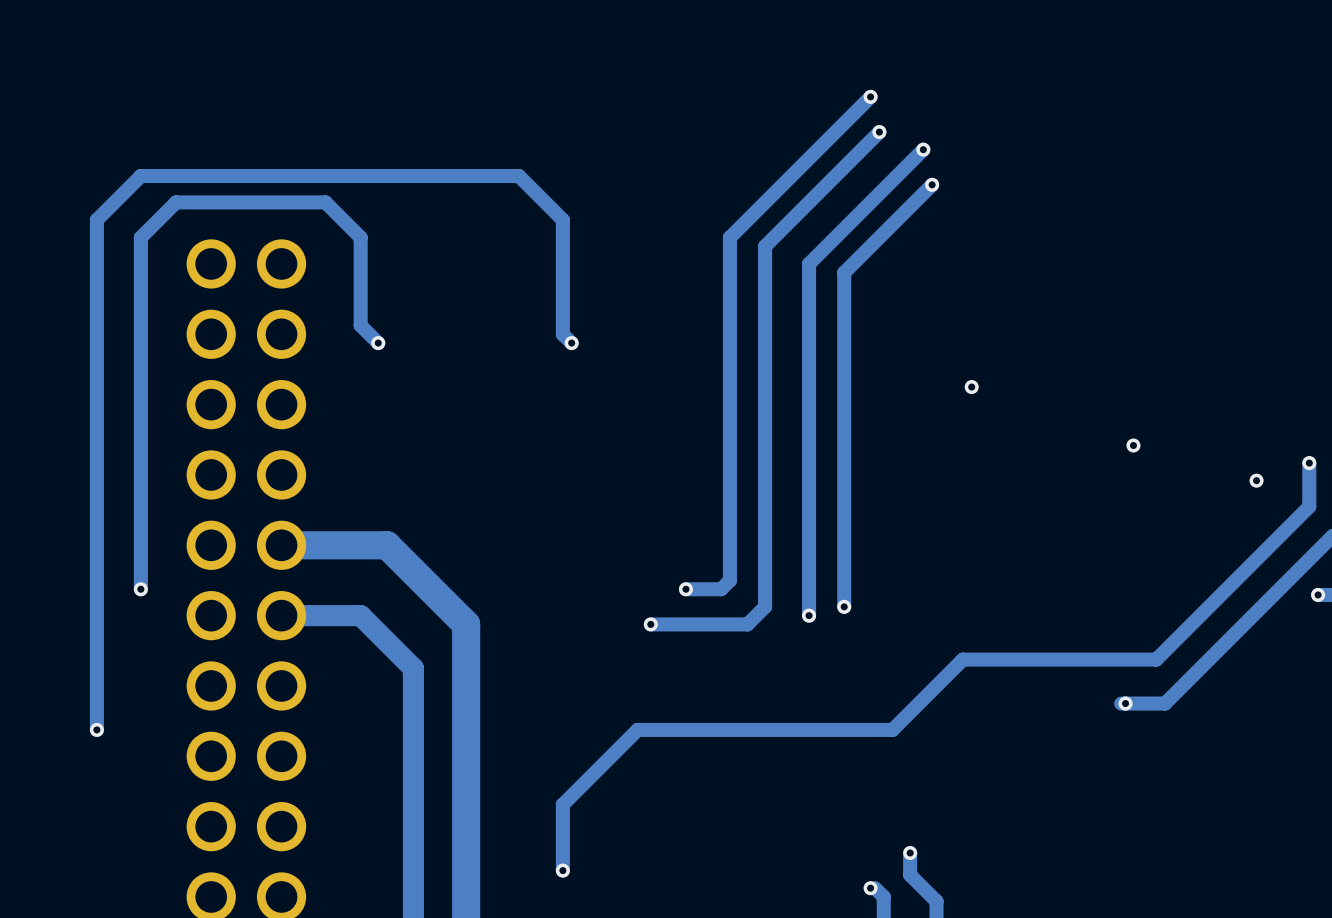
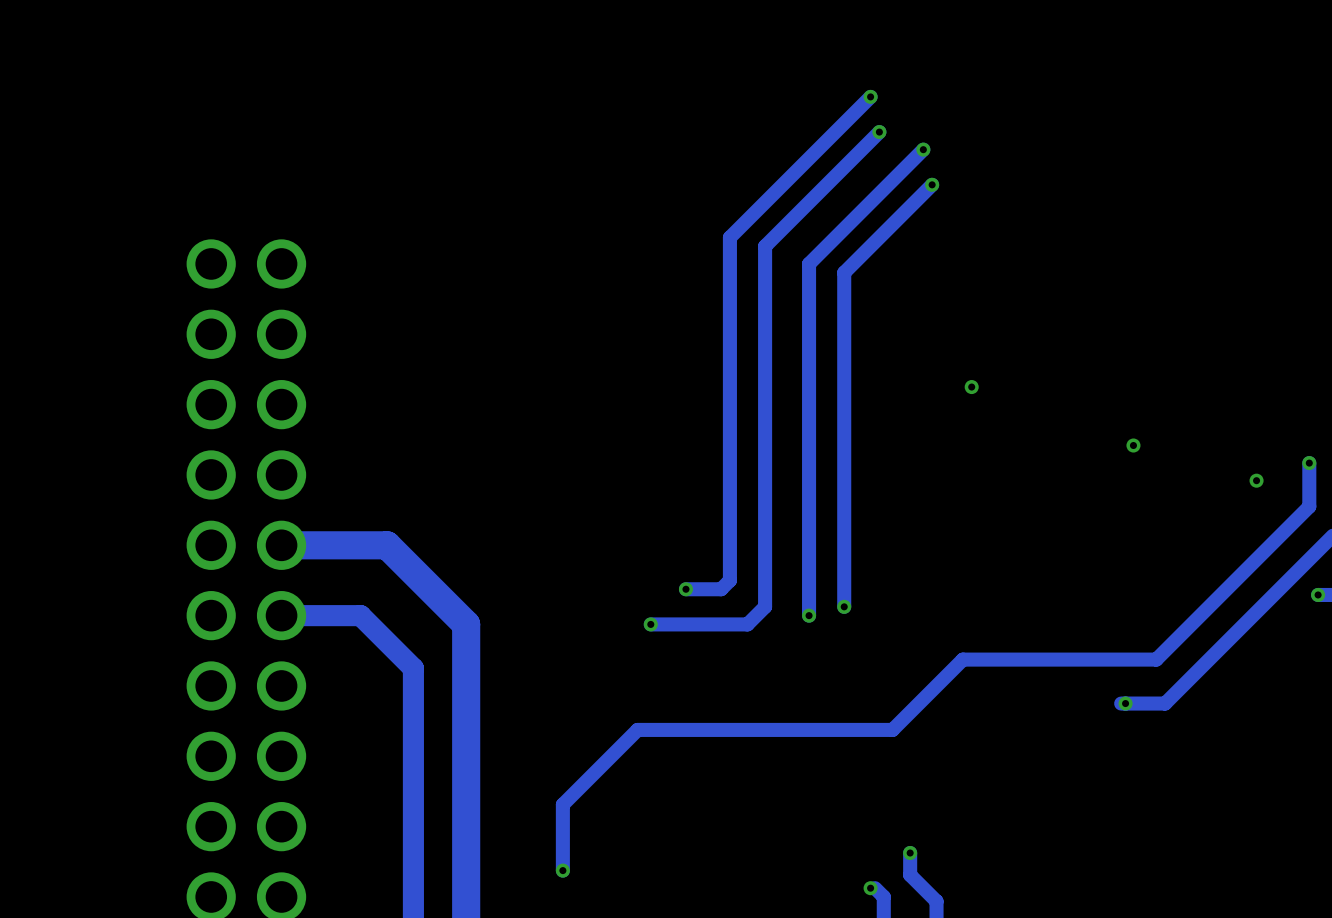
track: (378, 343) (360, 325) (360, 237) (325, 202) (176, 202) (140, 237) (140, 589) -> none
via: (378, 343) -> none
track: (571, 343) (562, 334) (562, 220) (518, 176) (140, 176) (96, 220) (96, 729) -> none
via: (571, 343) -> none
via: (140, 589) -> none
via: (96, 729) -> none

